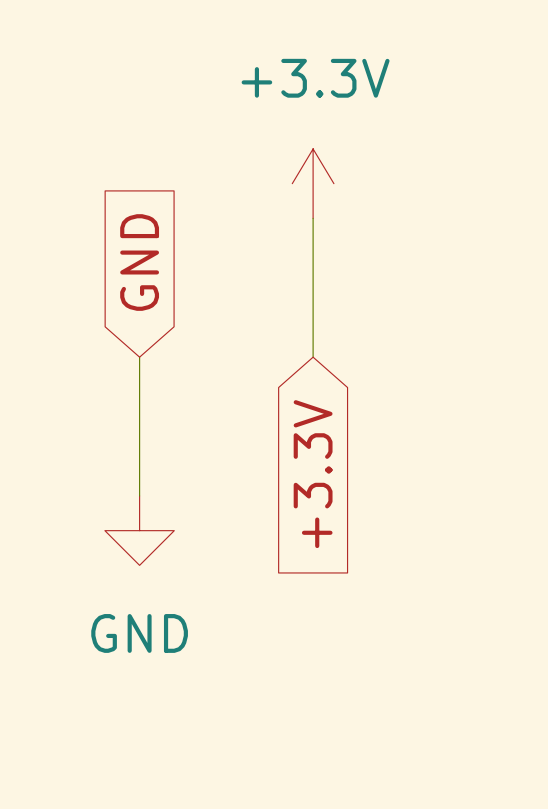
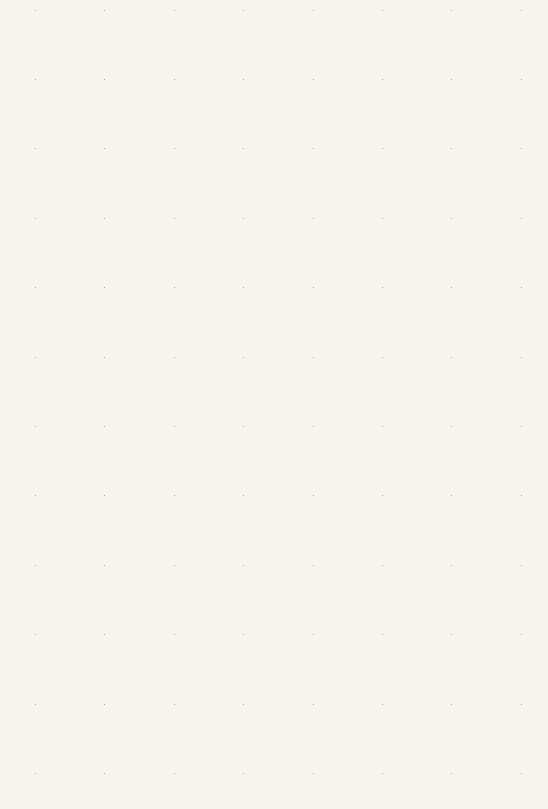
power symbol: +3.3V (313, 183) -> none
wire: (313, 218) (313, 357) -> none
global label: GND (139, 262) -> none
wire: (139, 357) (139, 495) -> none
global label: +3.3V (313, 474) -> none
power symbol: GND (139, 530) -> none

